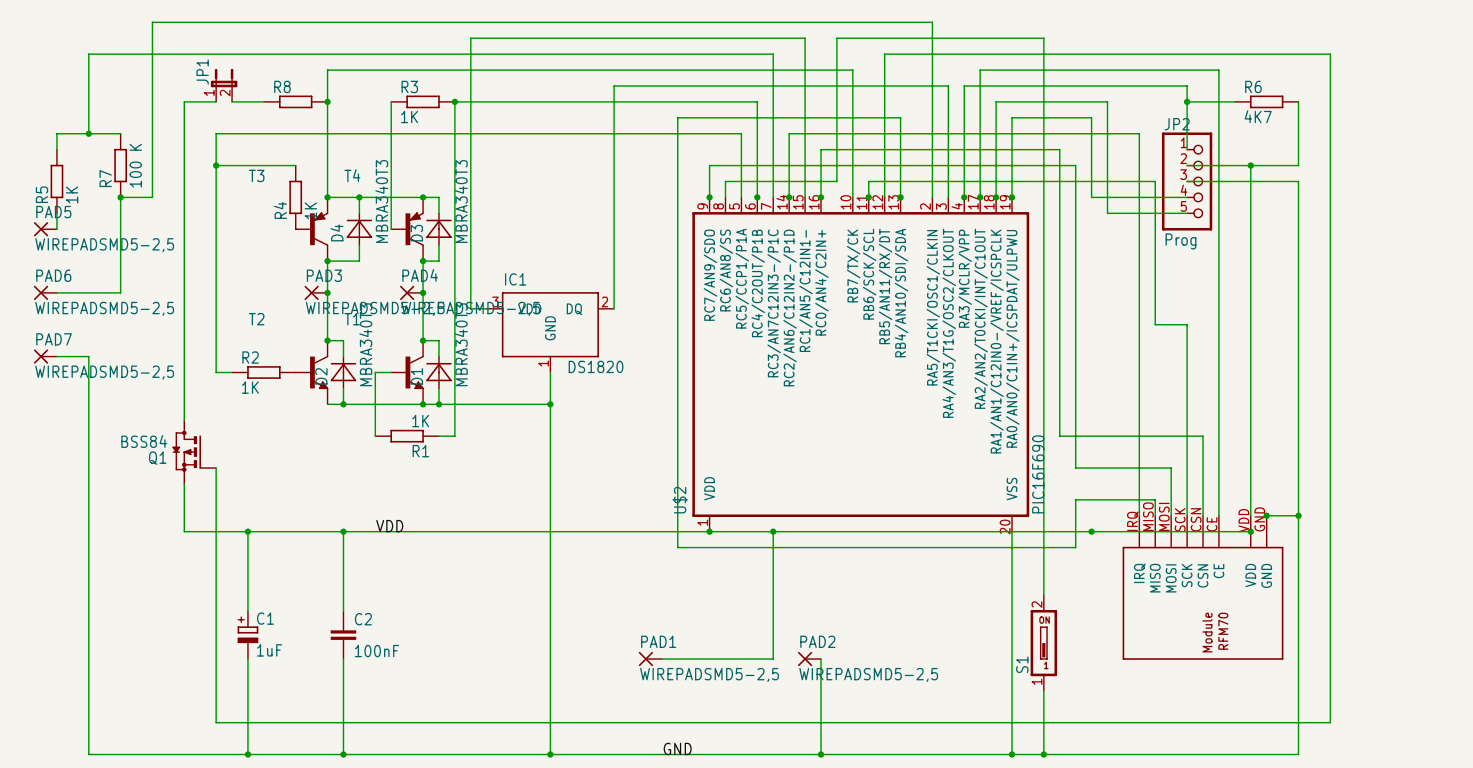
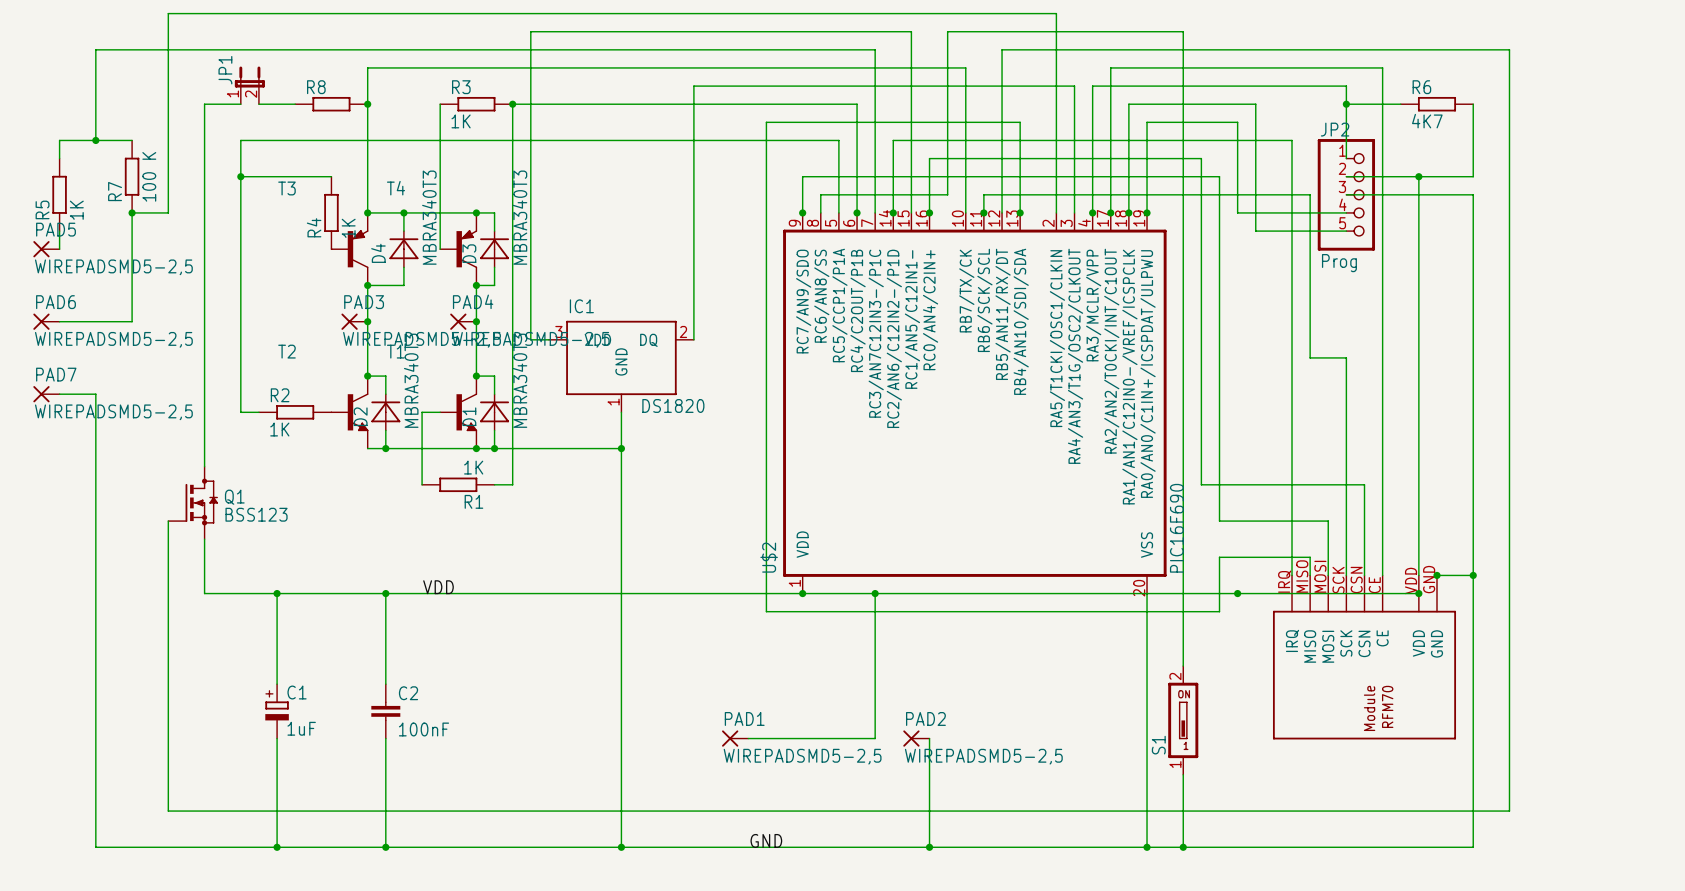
Q1 symbol: [172, 420, 217, 484] -> [168, 466, 218, 540]
Q1 value: BSS84 (144, 441) -> BSS123 (256, 514)
Q1 name position: Q1 (157, 458) -> Q1 (234, 497)
wire: (216, 468) (216, 722) -> (168, 521) (168, 811) (240, 811)

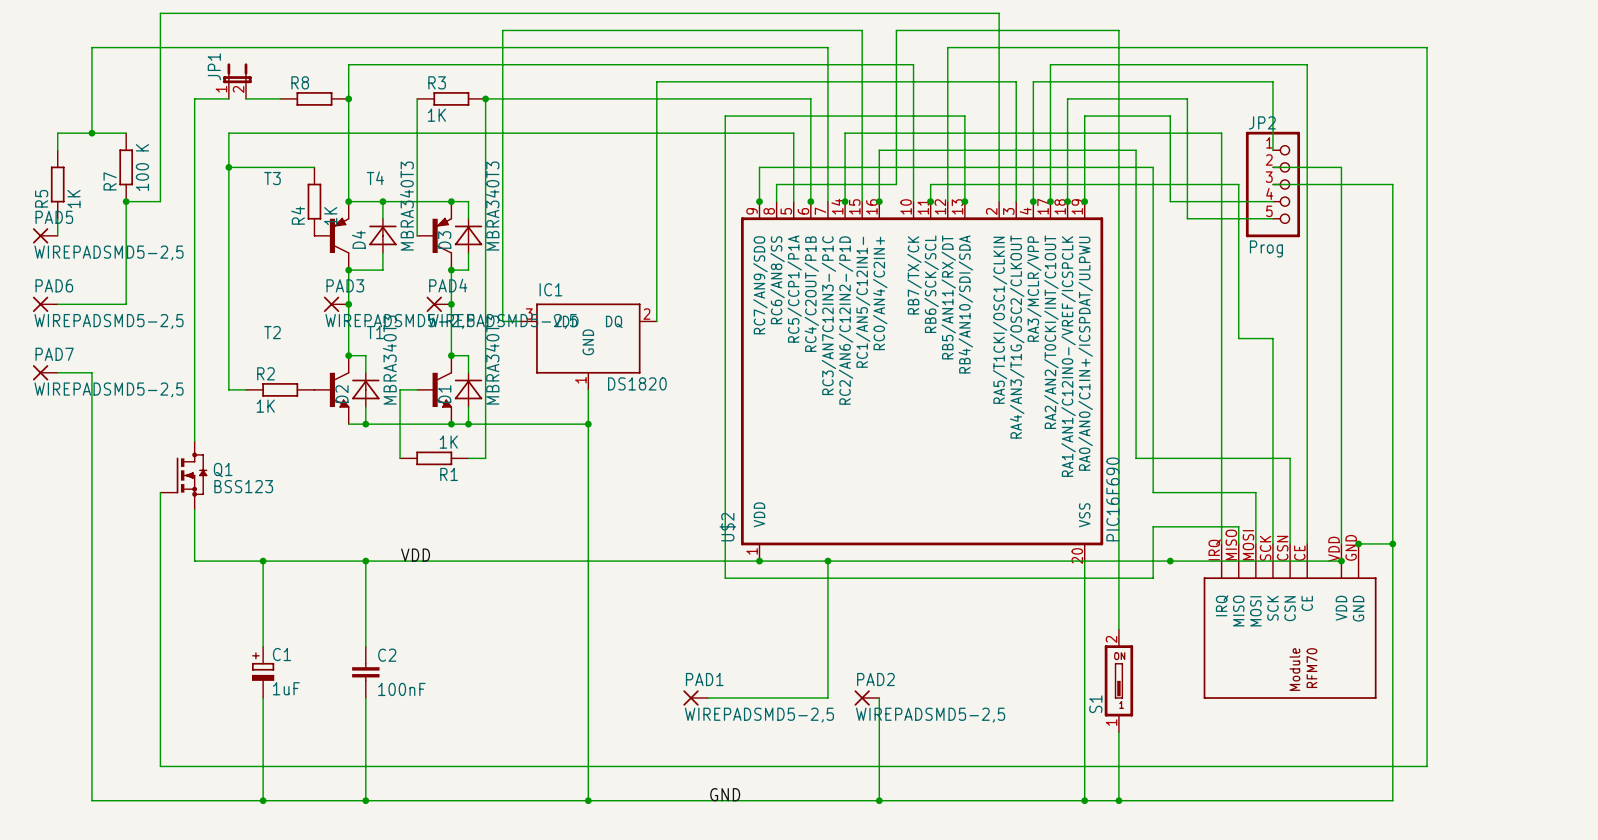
wire: (1346, 104) (1400, 104) -> none
junction: (1346, 104) -> none
R6: 4K7 (1436, 104) -> none
wire: (1473, 104) (1473, 176) (1418, 176) -> none
junction: (1418, 176) -> none

